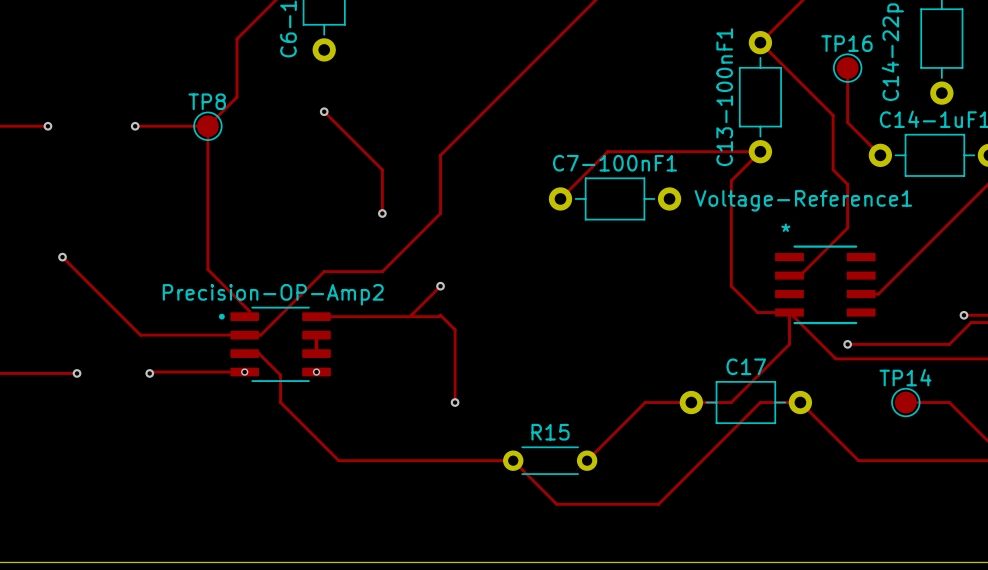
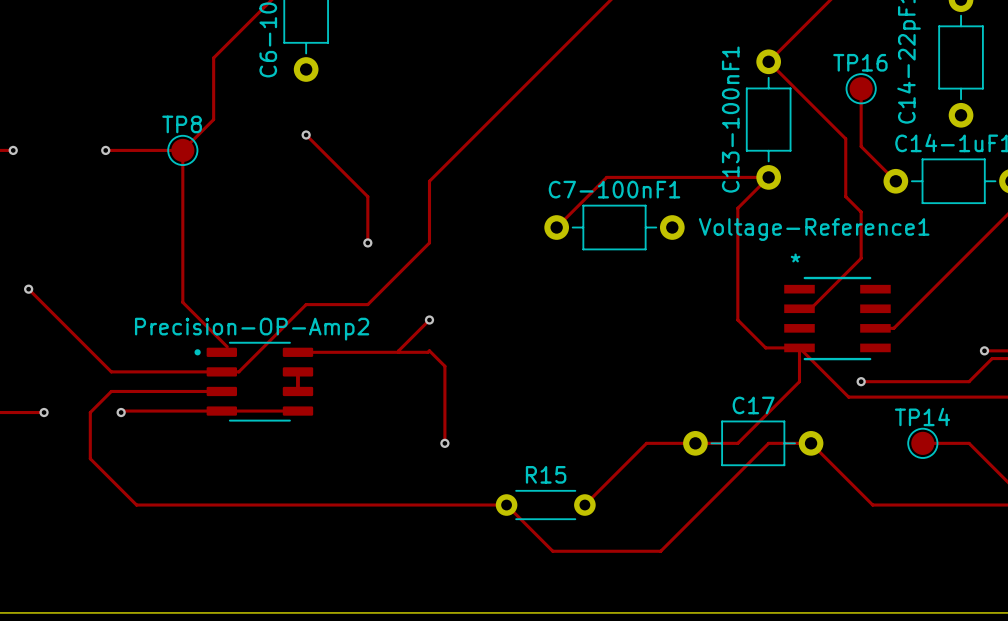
track: (244, 353) (259, 353) (280, 375) (280, 402) (338, 460) -> (221, 391) (111, 391) (90, 412) (90, 458) (136, 505) (321, 505)
track: none -> (221, 411) (297, 411)
via: (244, 372) -> none
via: (316, 372) -> none

